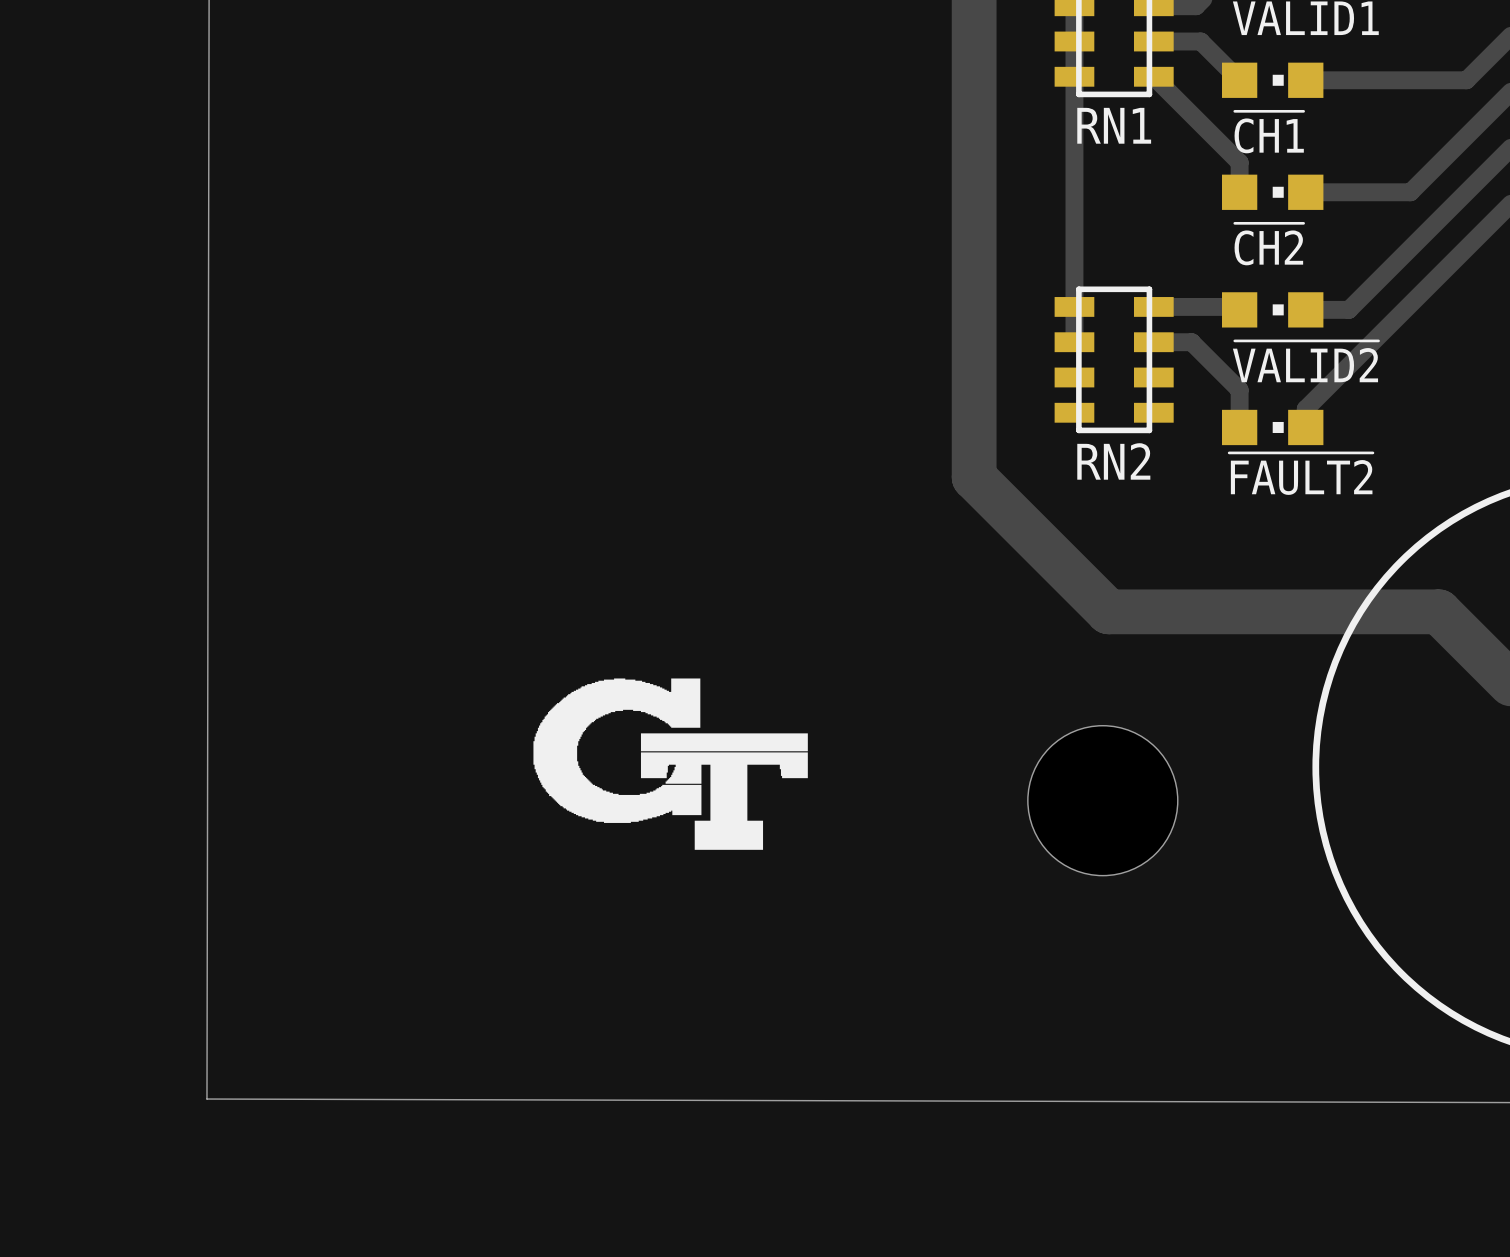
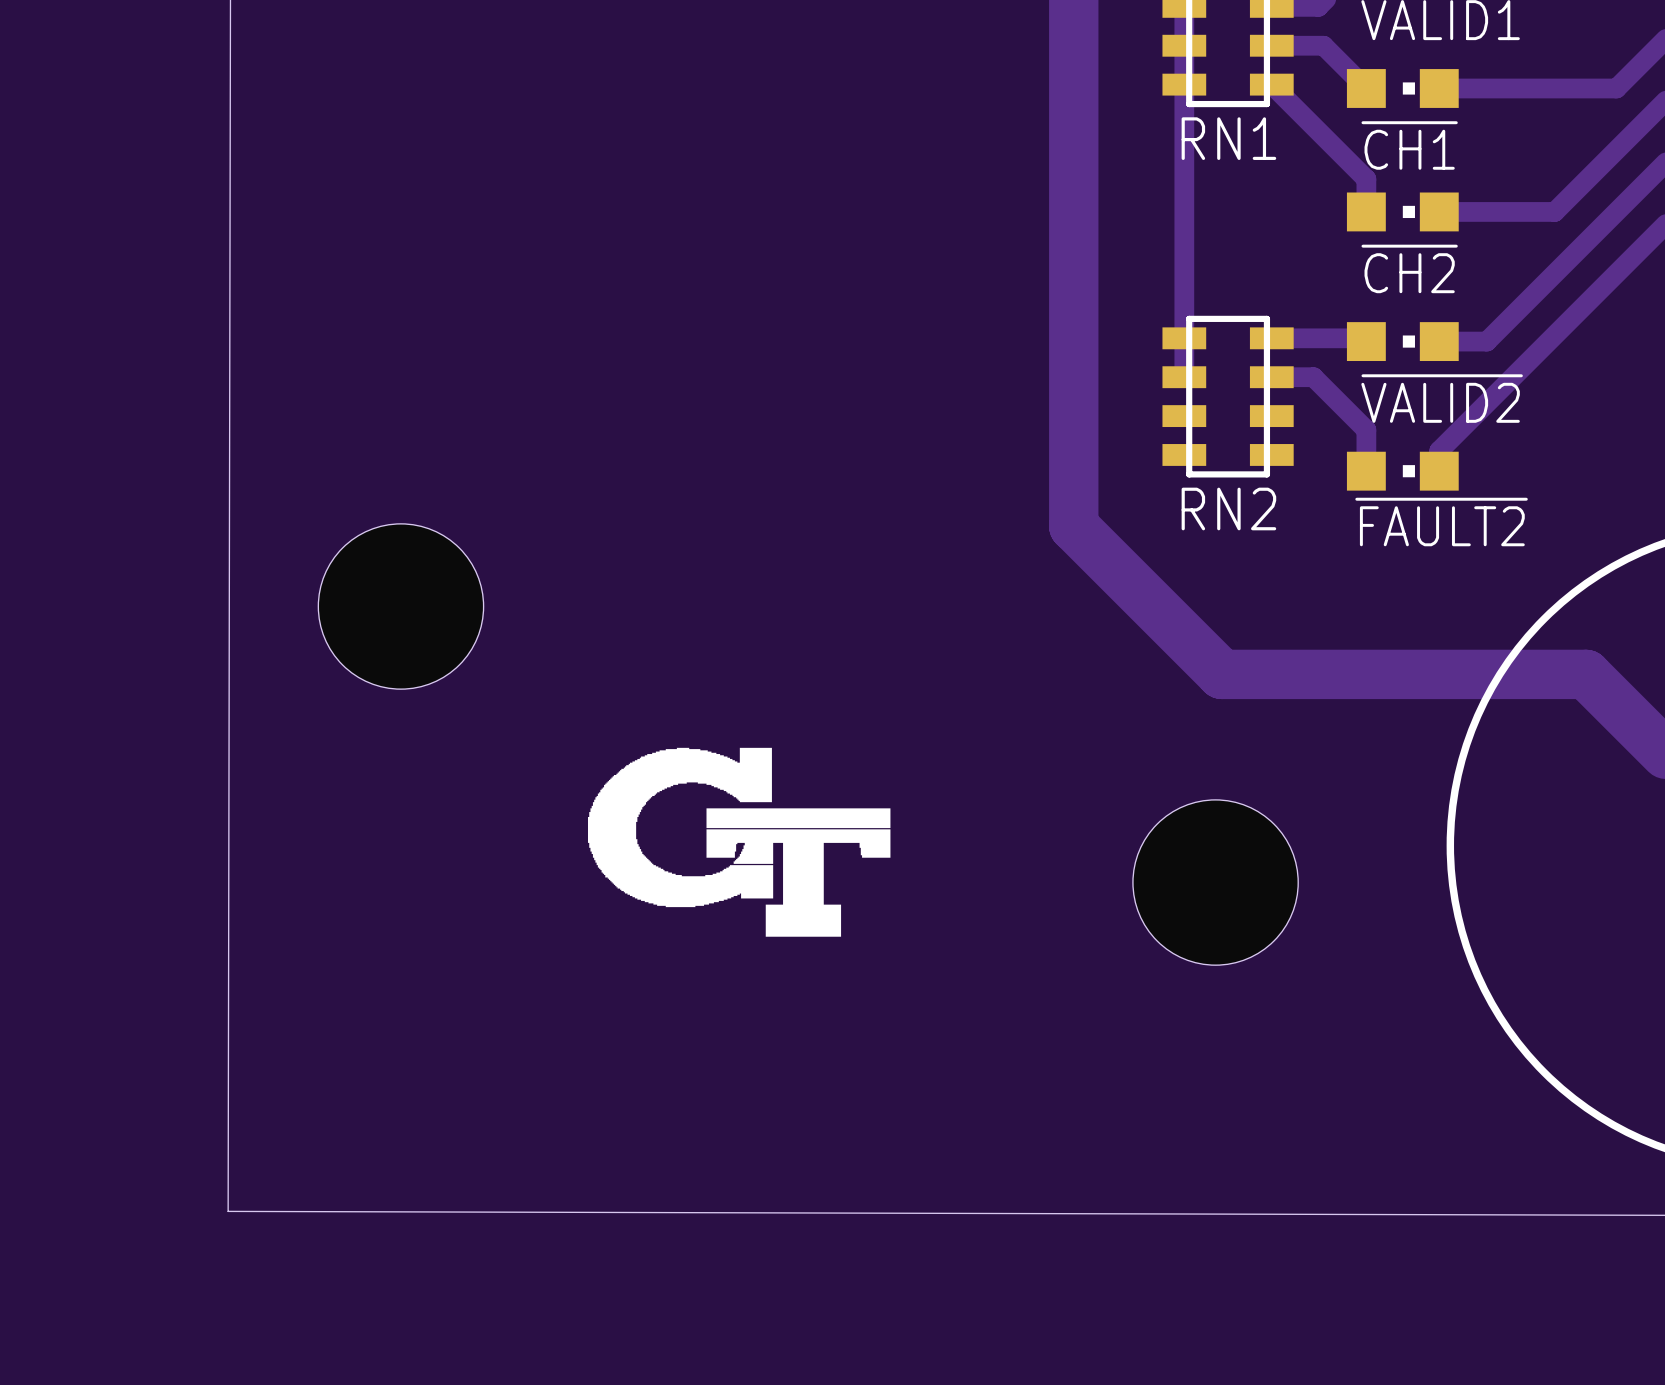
part: none -> (400, 606)

